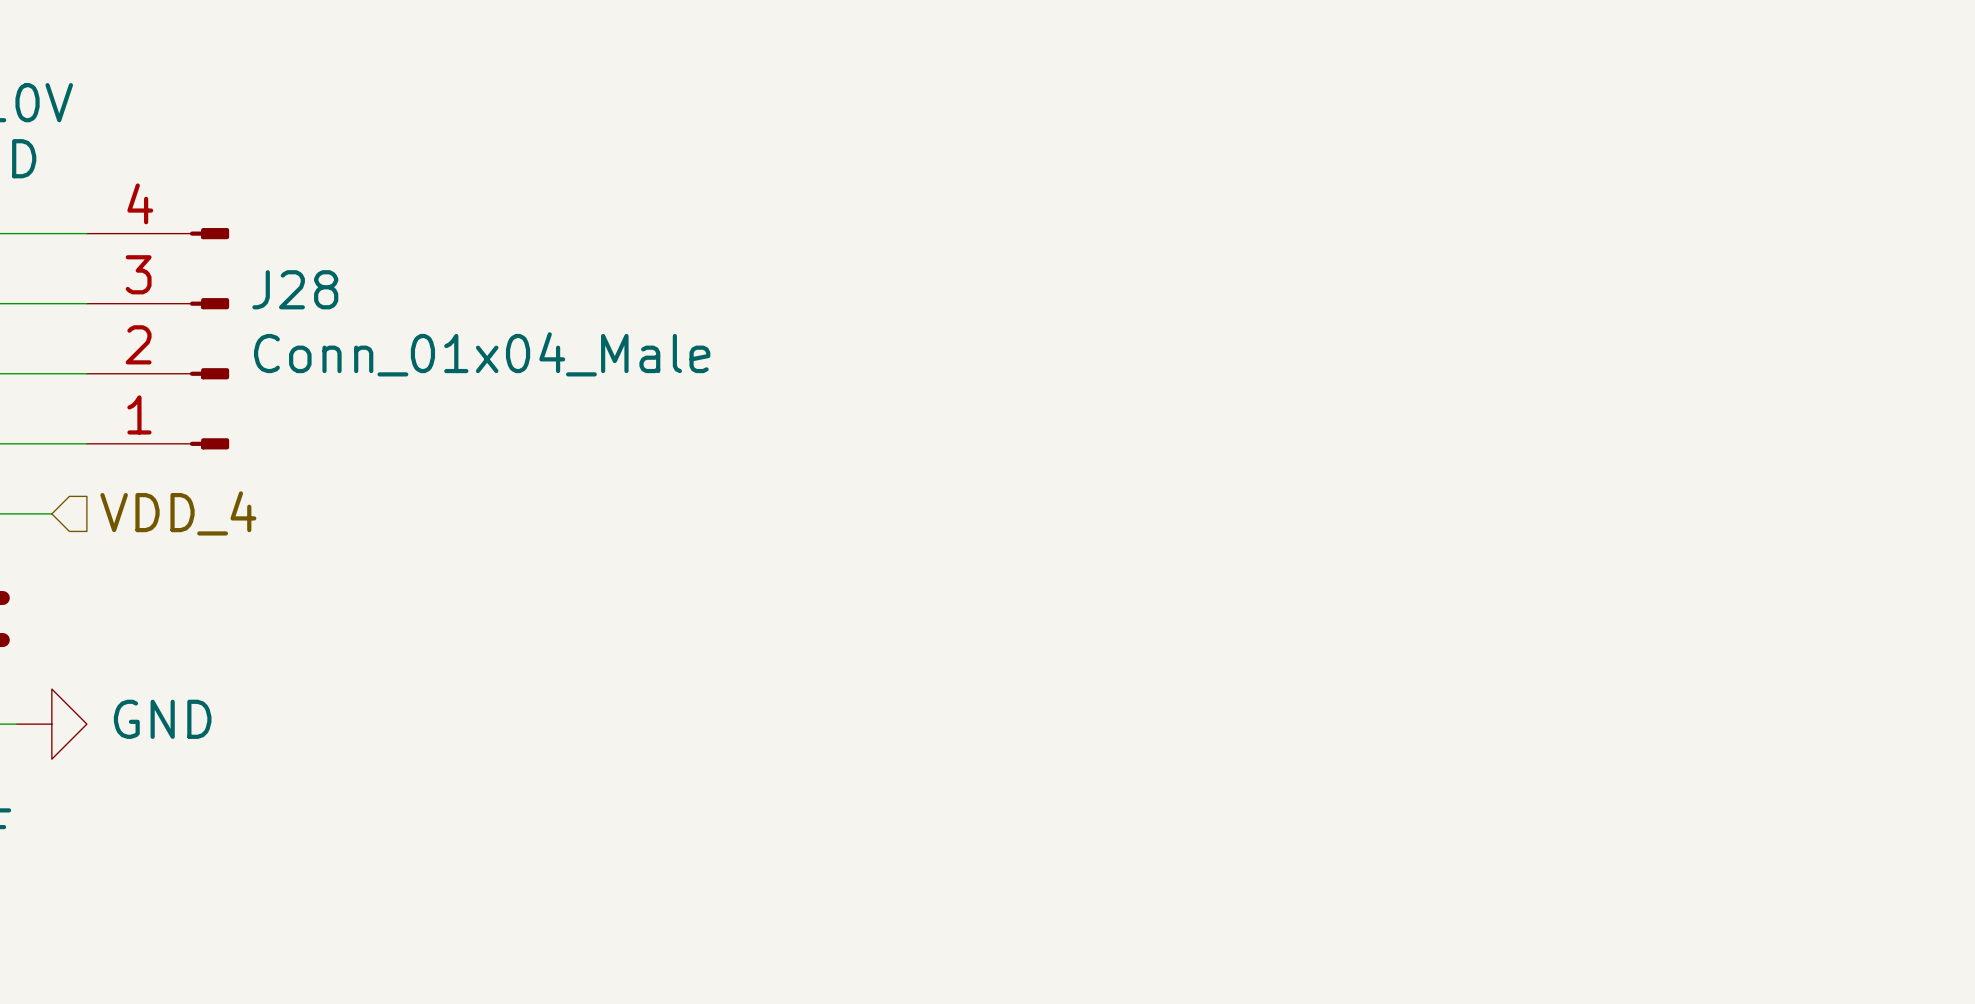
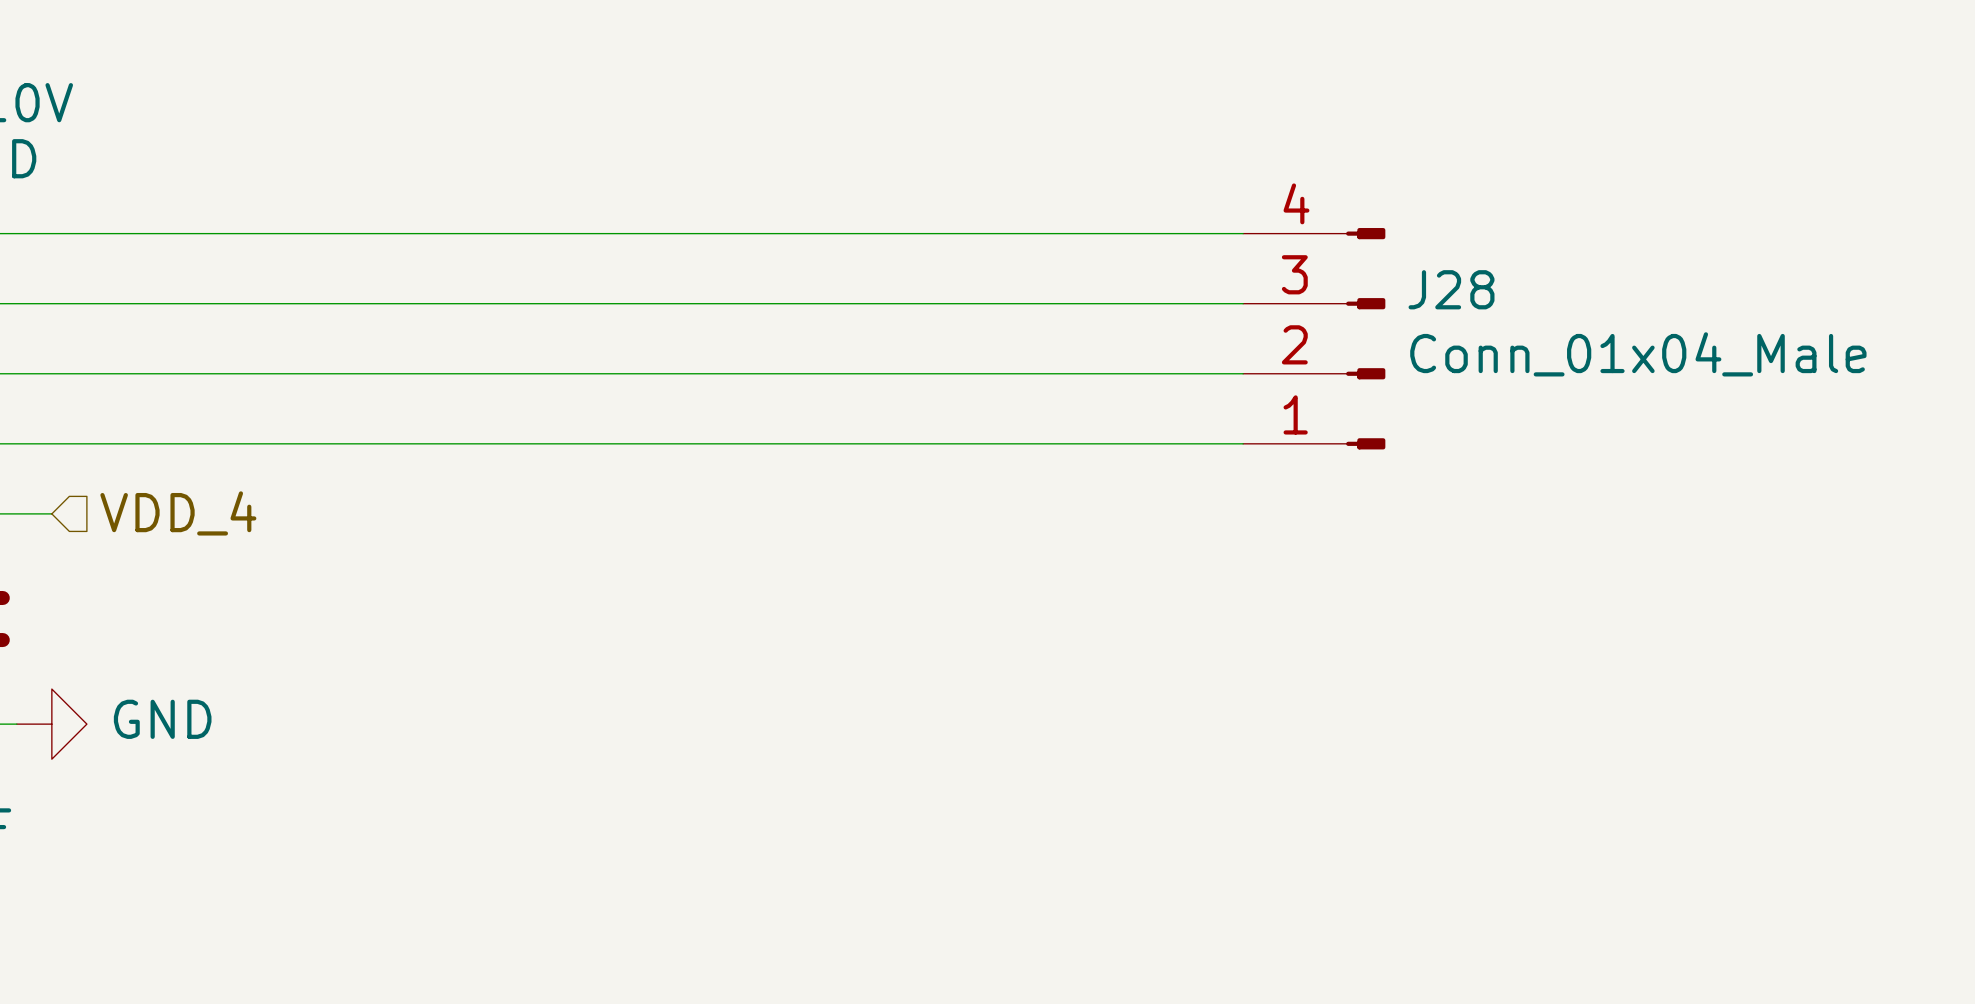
wire: none -> (86, 233) (1243, 233)
wire: none -> (86, 303) (1243, 303)
J28 position: (158, 338) -> (1314, 338)
wire: none -> (86, 373) (1243, 373)
wire: none -> (86, 443) (1243, 443)

